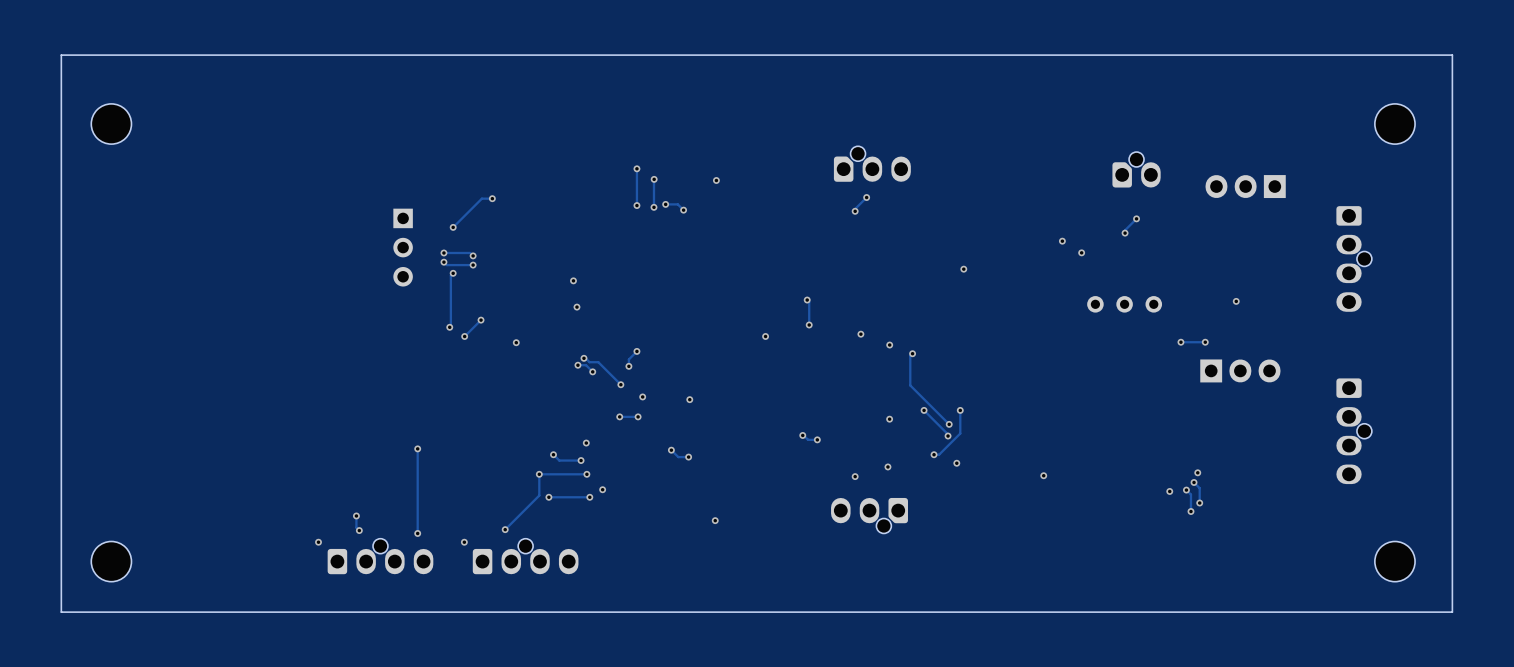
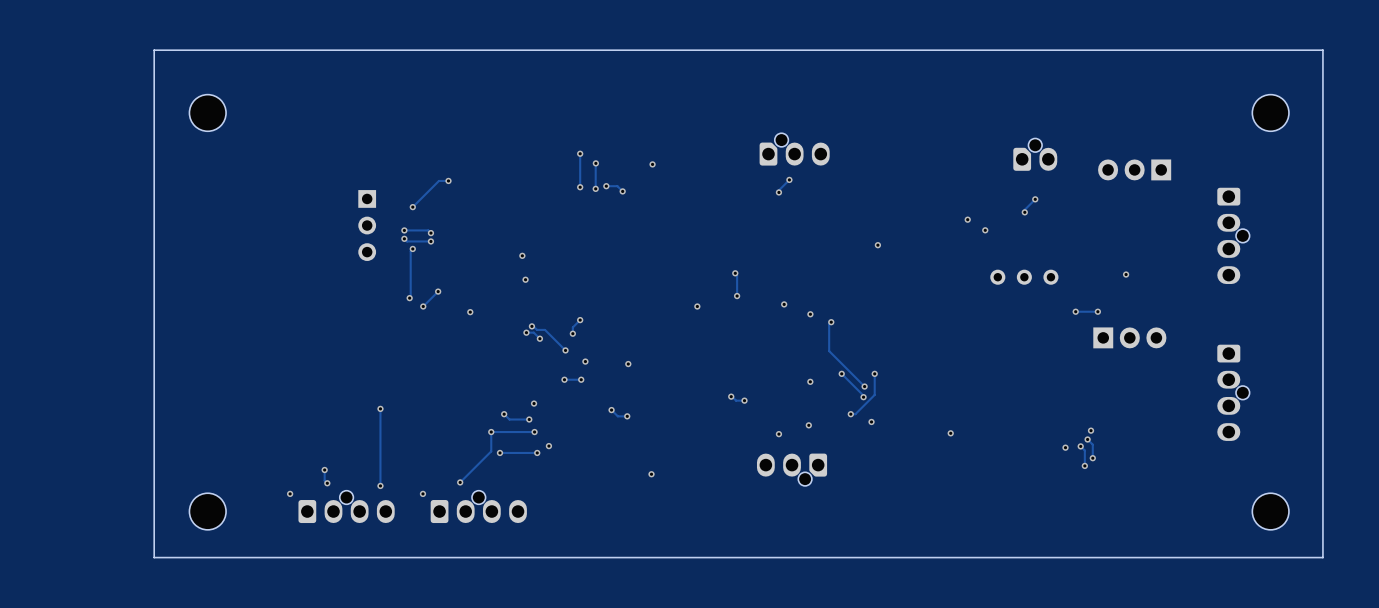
board edge: (169, 55) (61, 55) (61, 612) (169, 612) -> (154, 50) (154, 557)
part position: (111, 124) -> (207, 112)
part position: (111, 561) -> (207, 511)

